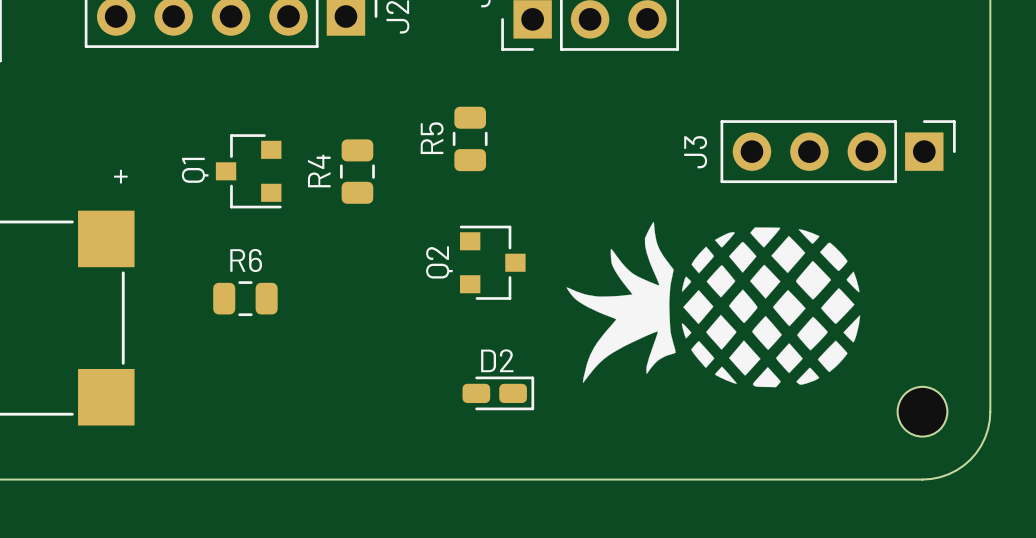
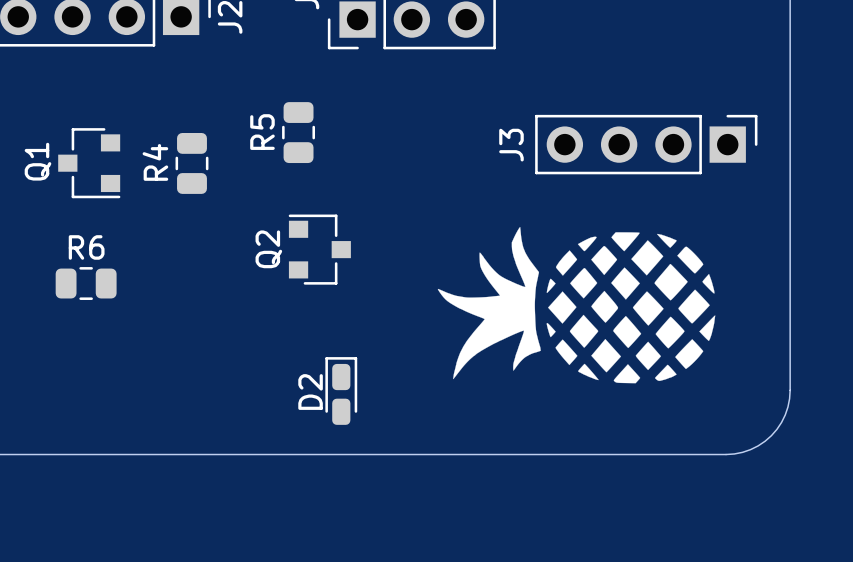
drawing position: (713, 304) -> (576, 305)
D2 rotation: 0° (498, 393) -> 90° counterclockwise (341, 390)
part: (922, 411) -> none

